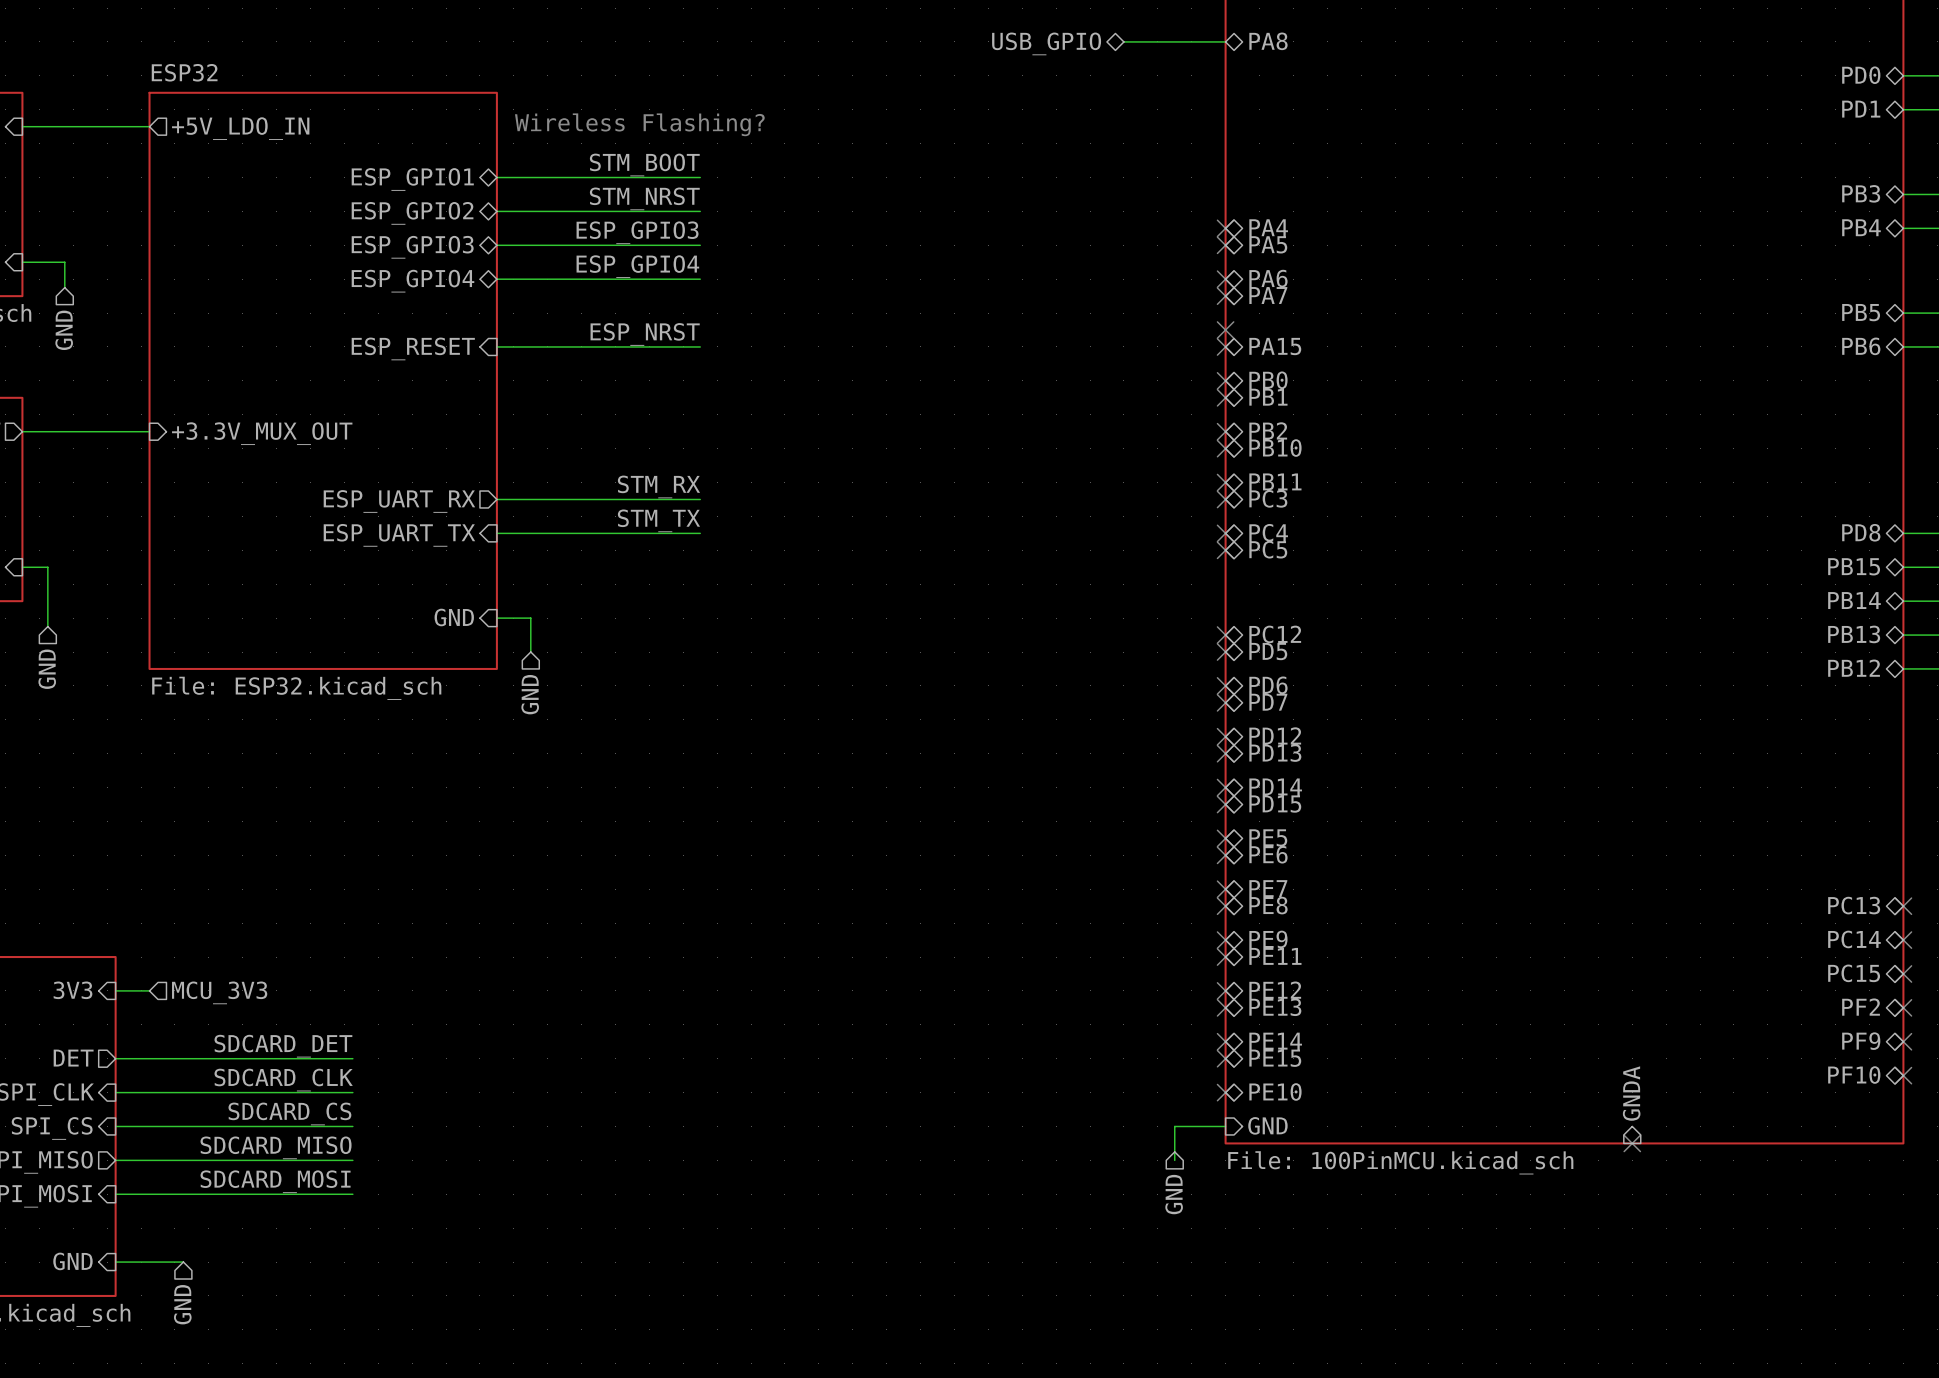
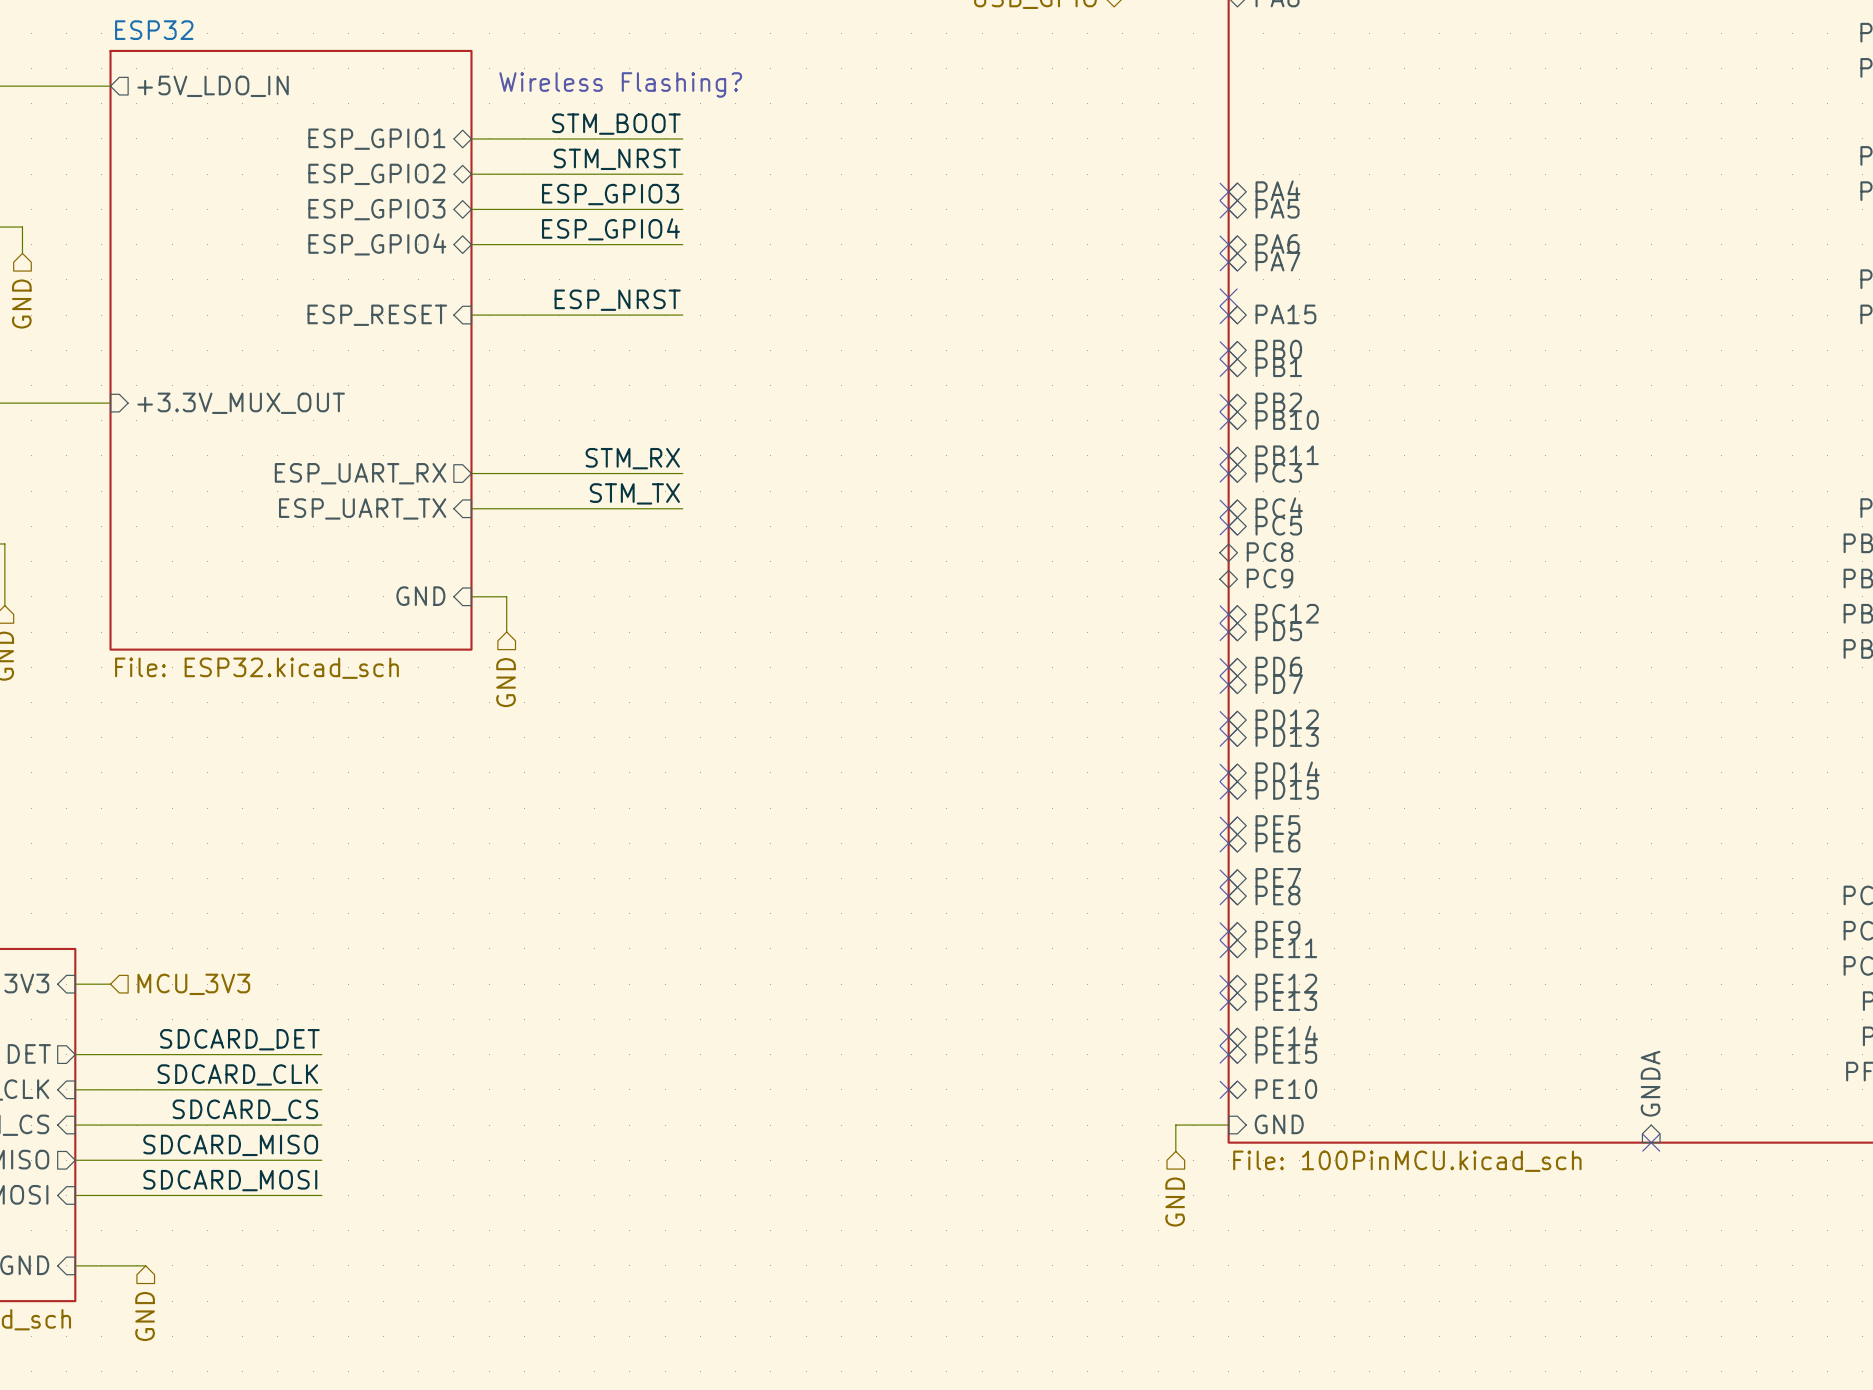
sheet pin: none -> PC8 (1270, 552)
sheet pin: none -> PC9 (1270, 578)
wire: (1174, 1151) (1174, 1160) -> none

